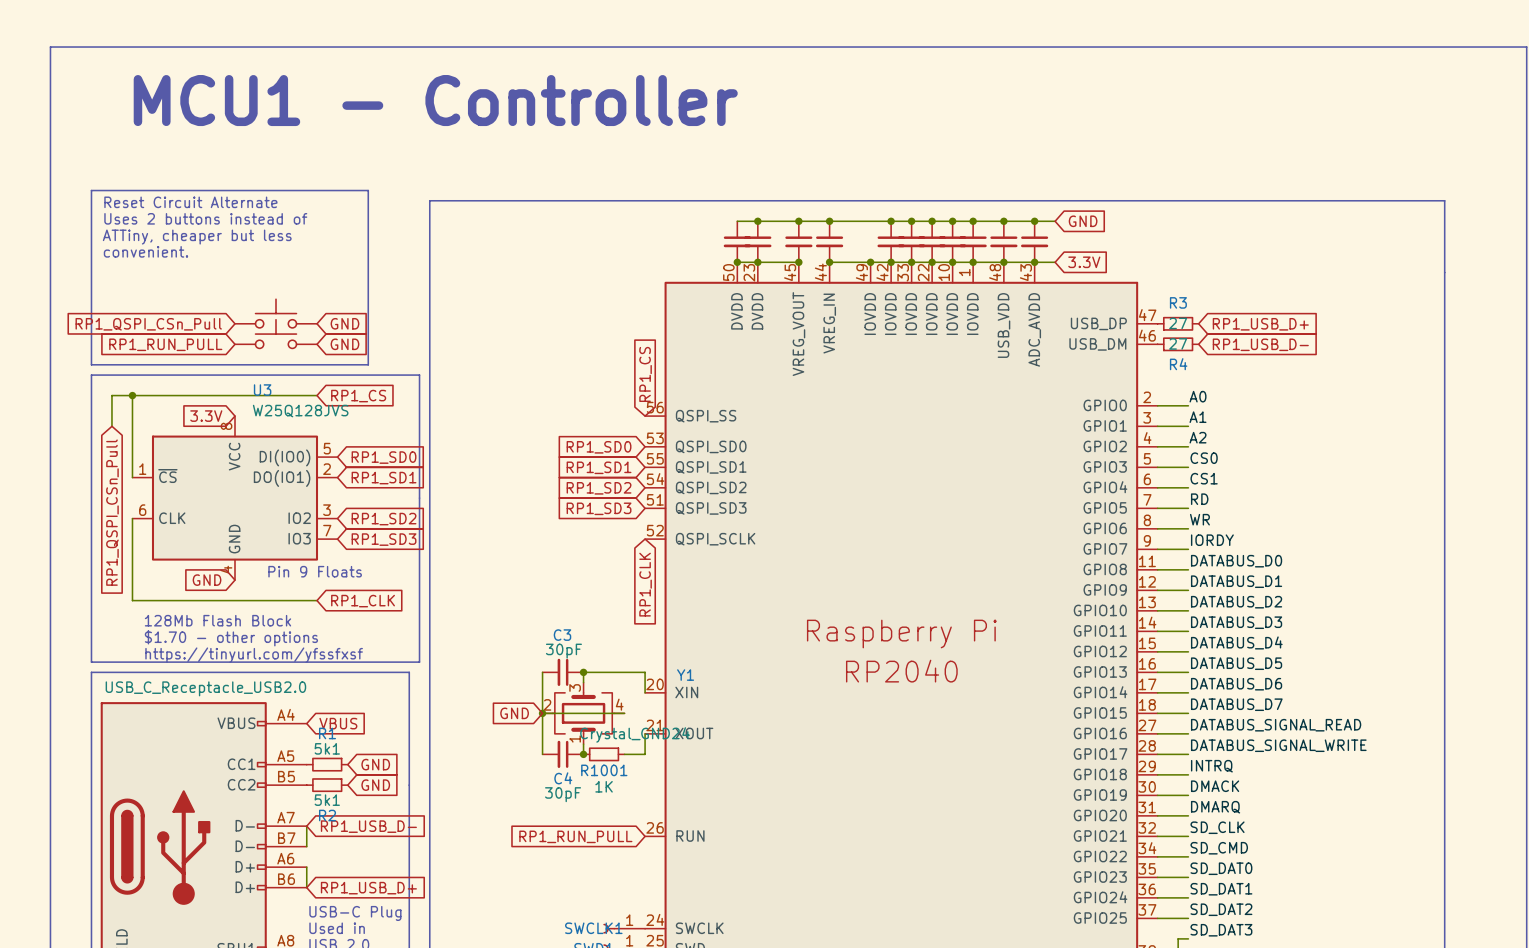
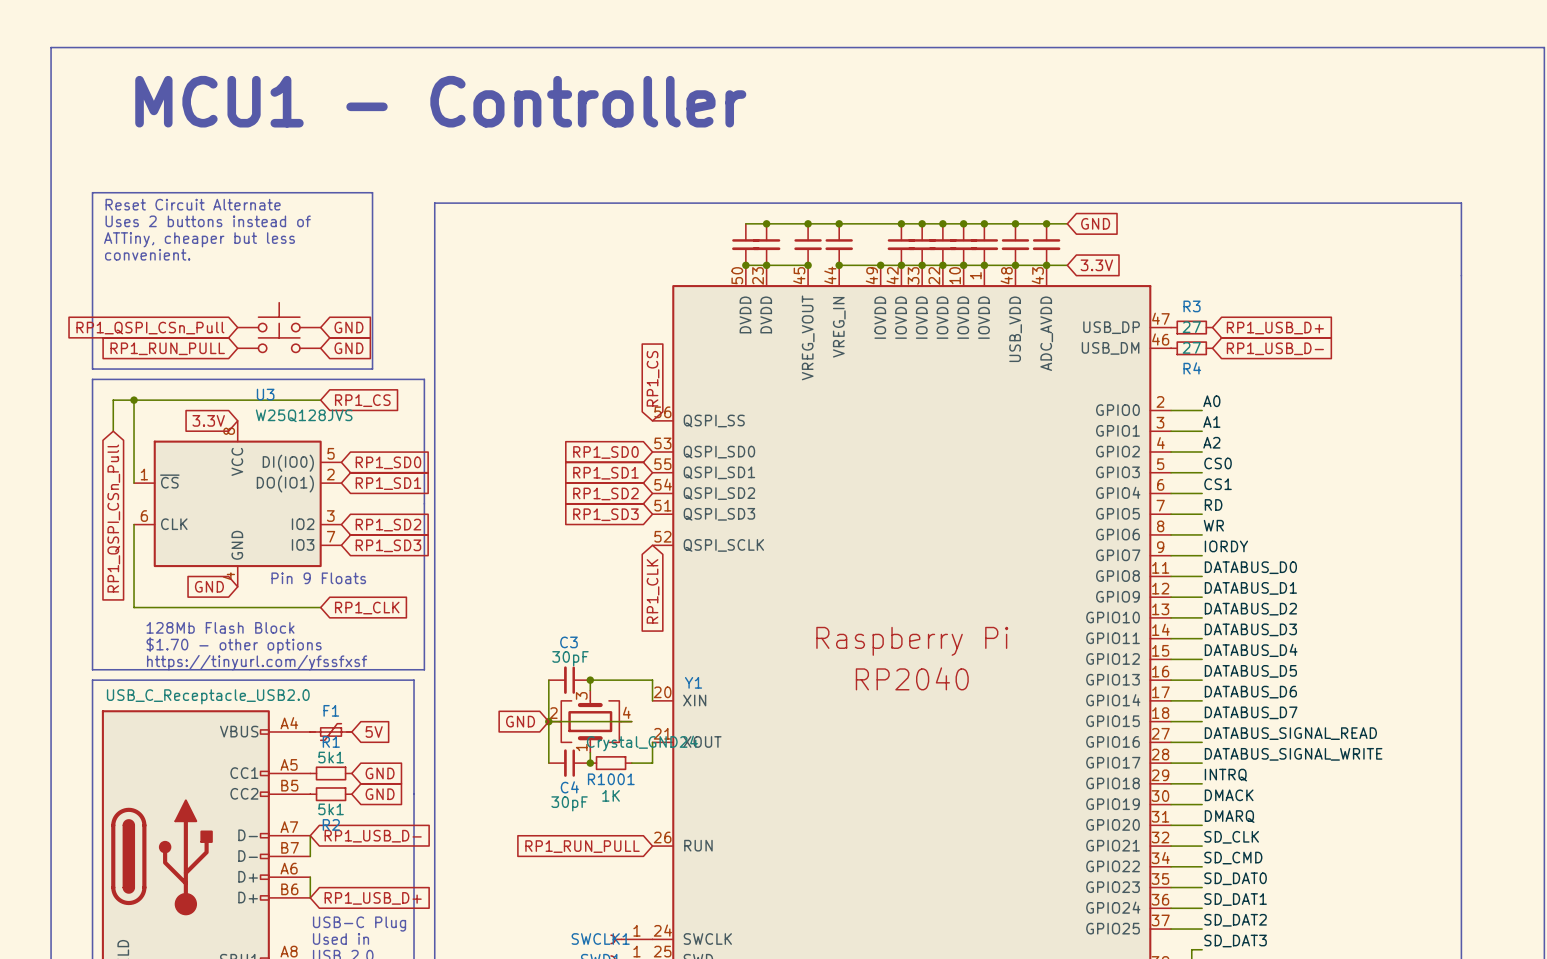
F1: none -> (331, 731)
global label: VBUS (338, 723) -> none
global label: none -> 5V (374, 731)

